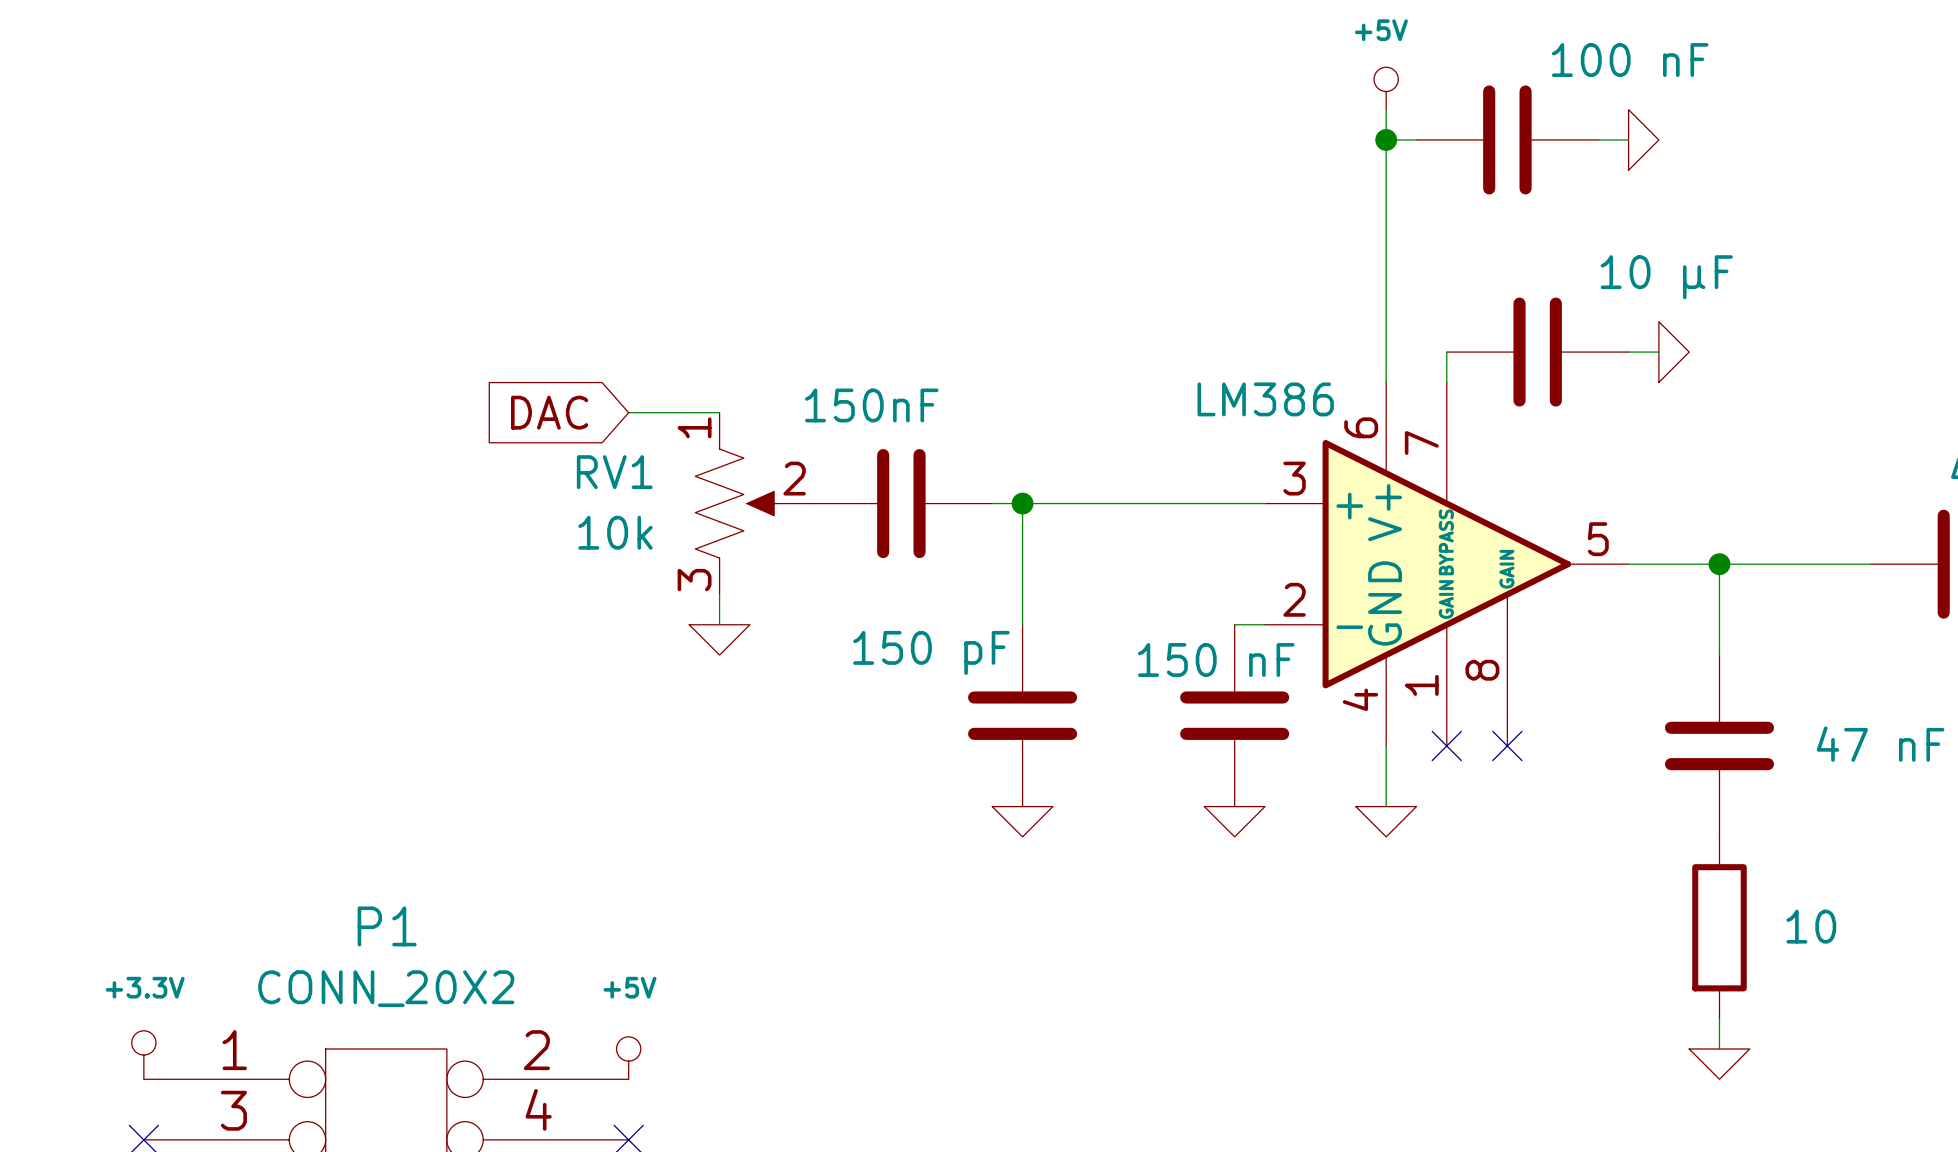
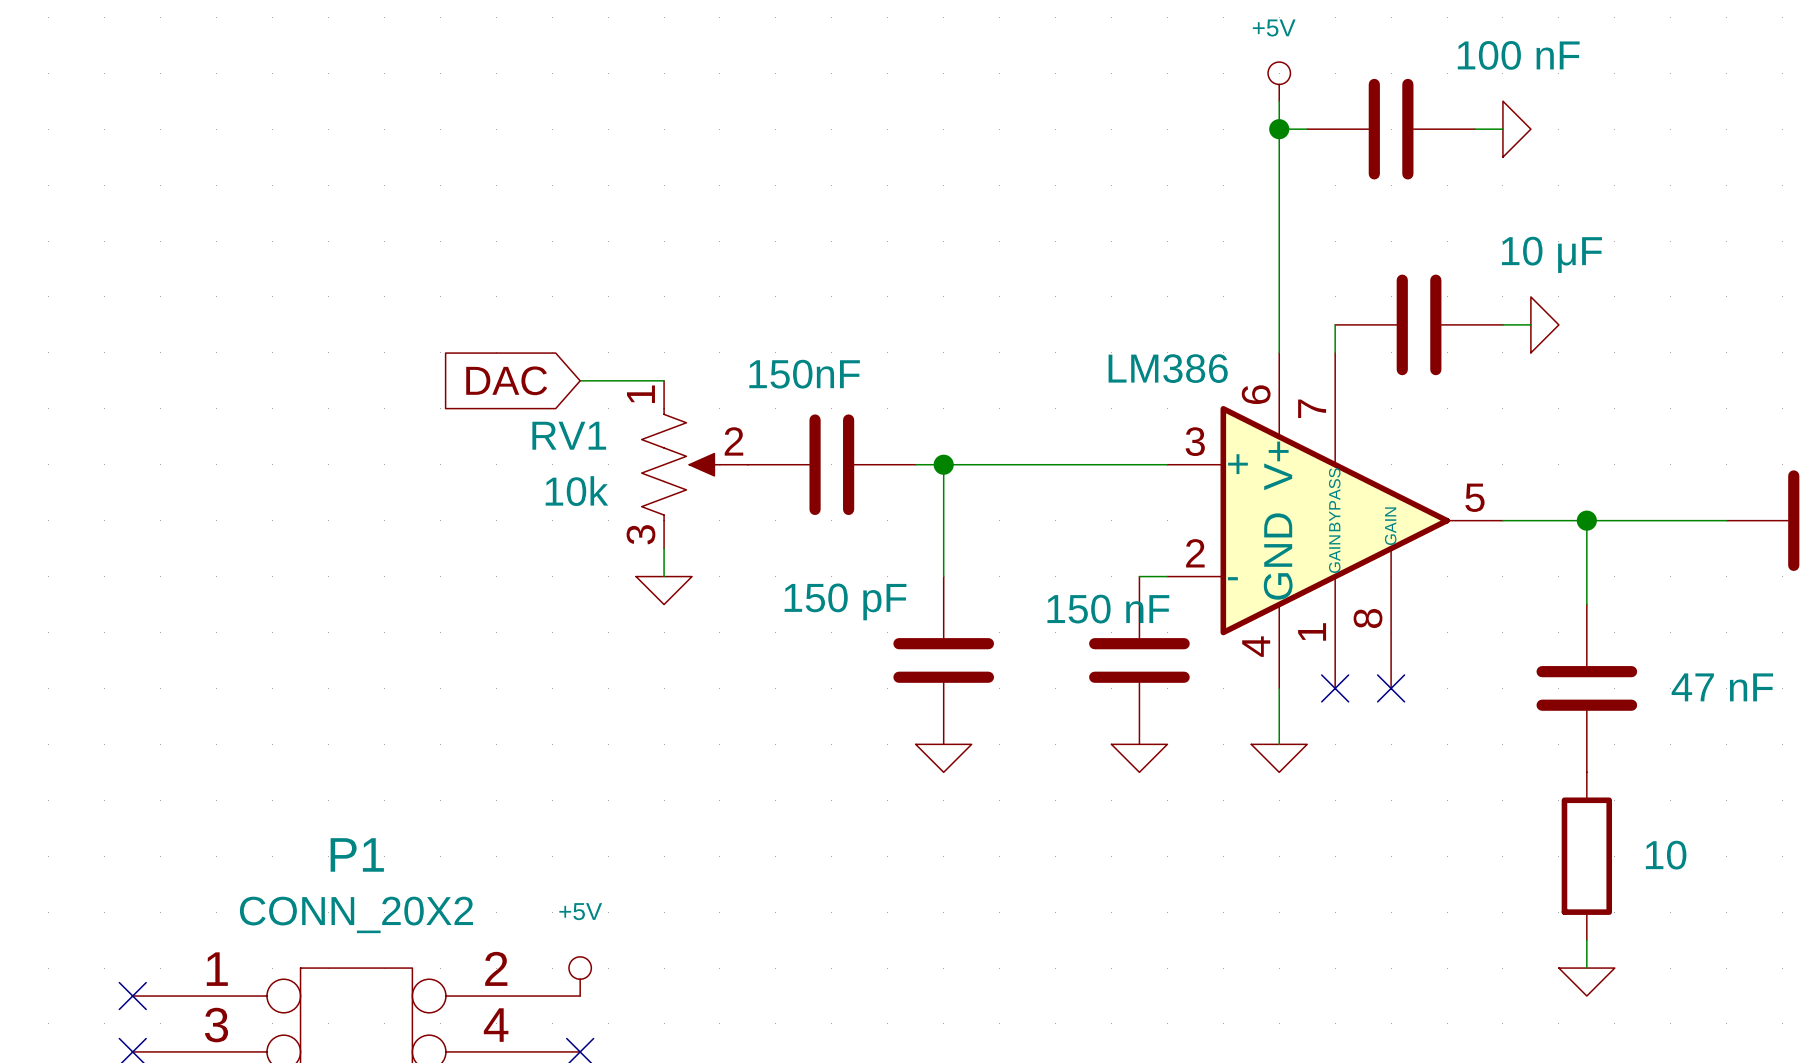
power symbol: +3.3V (143, 1055) -> none
no-connect mark: none -> (132, 996)

